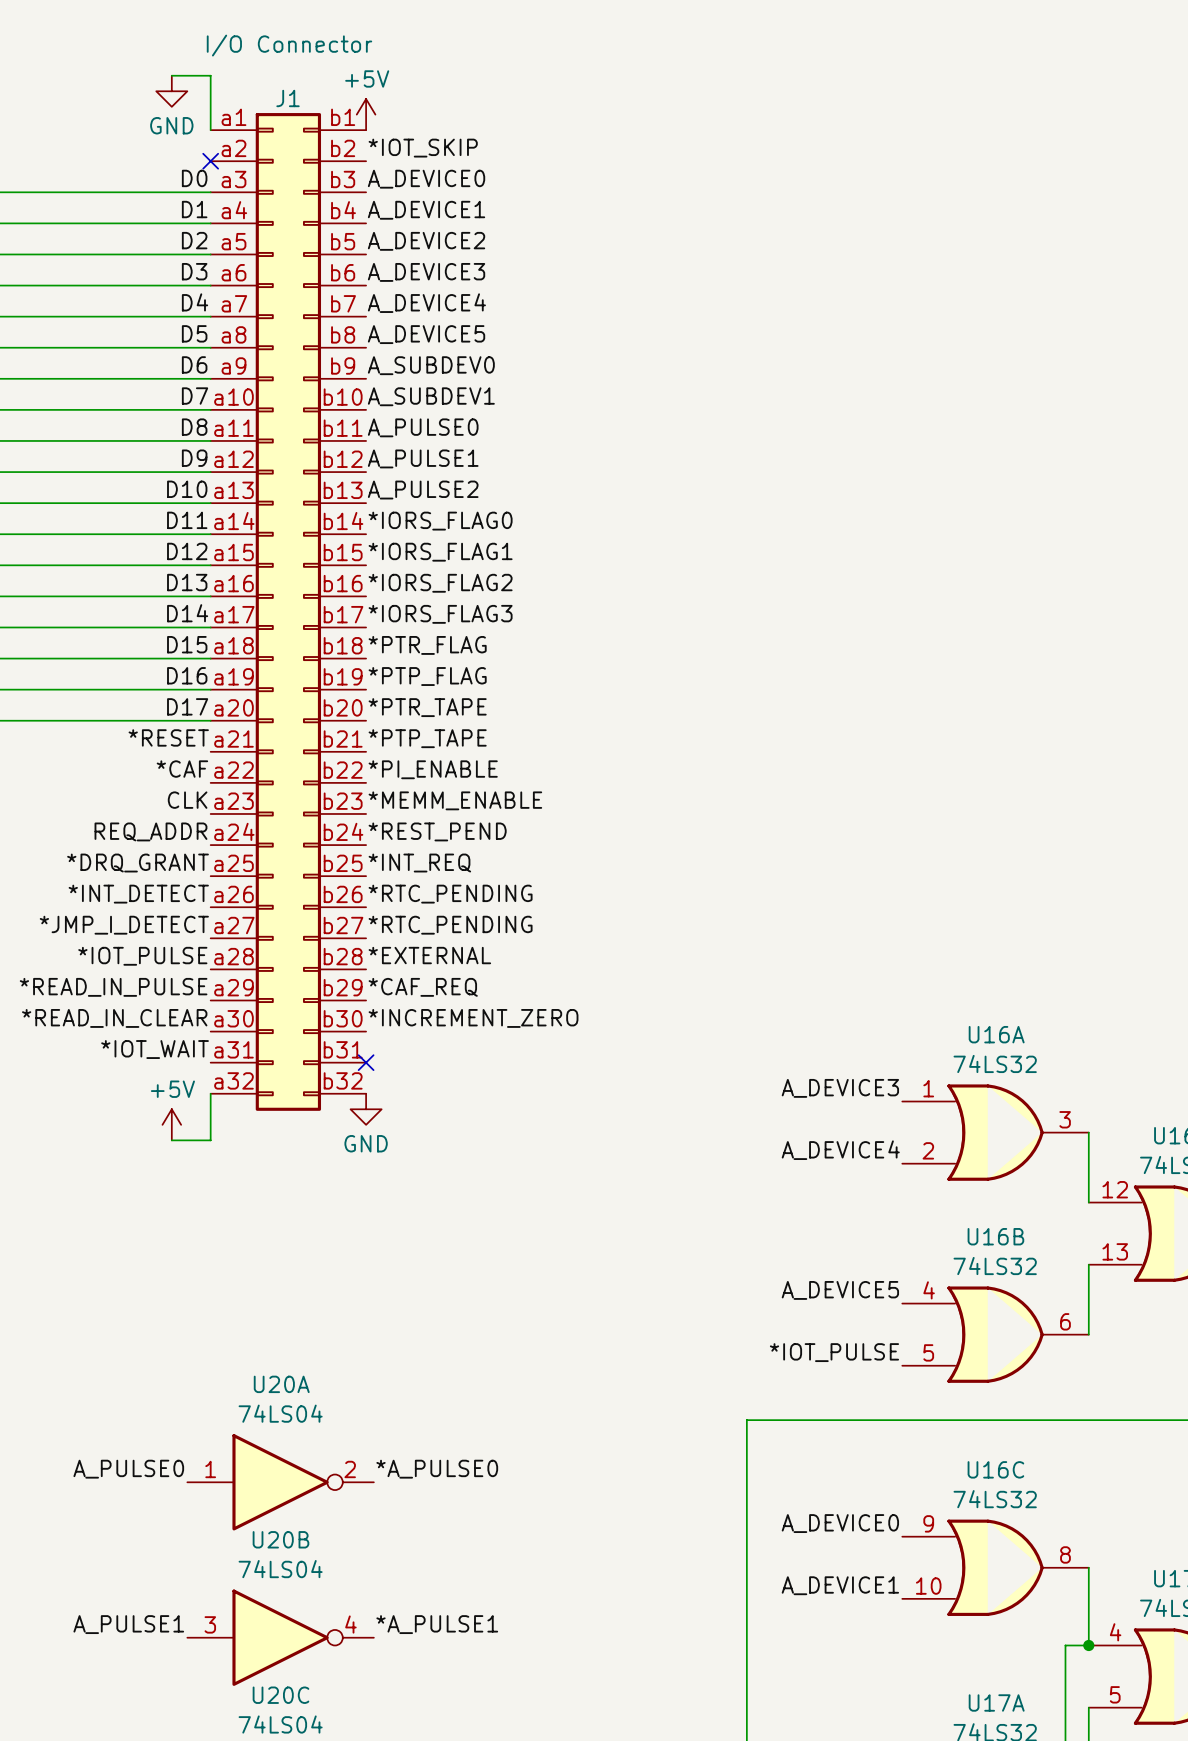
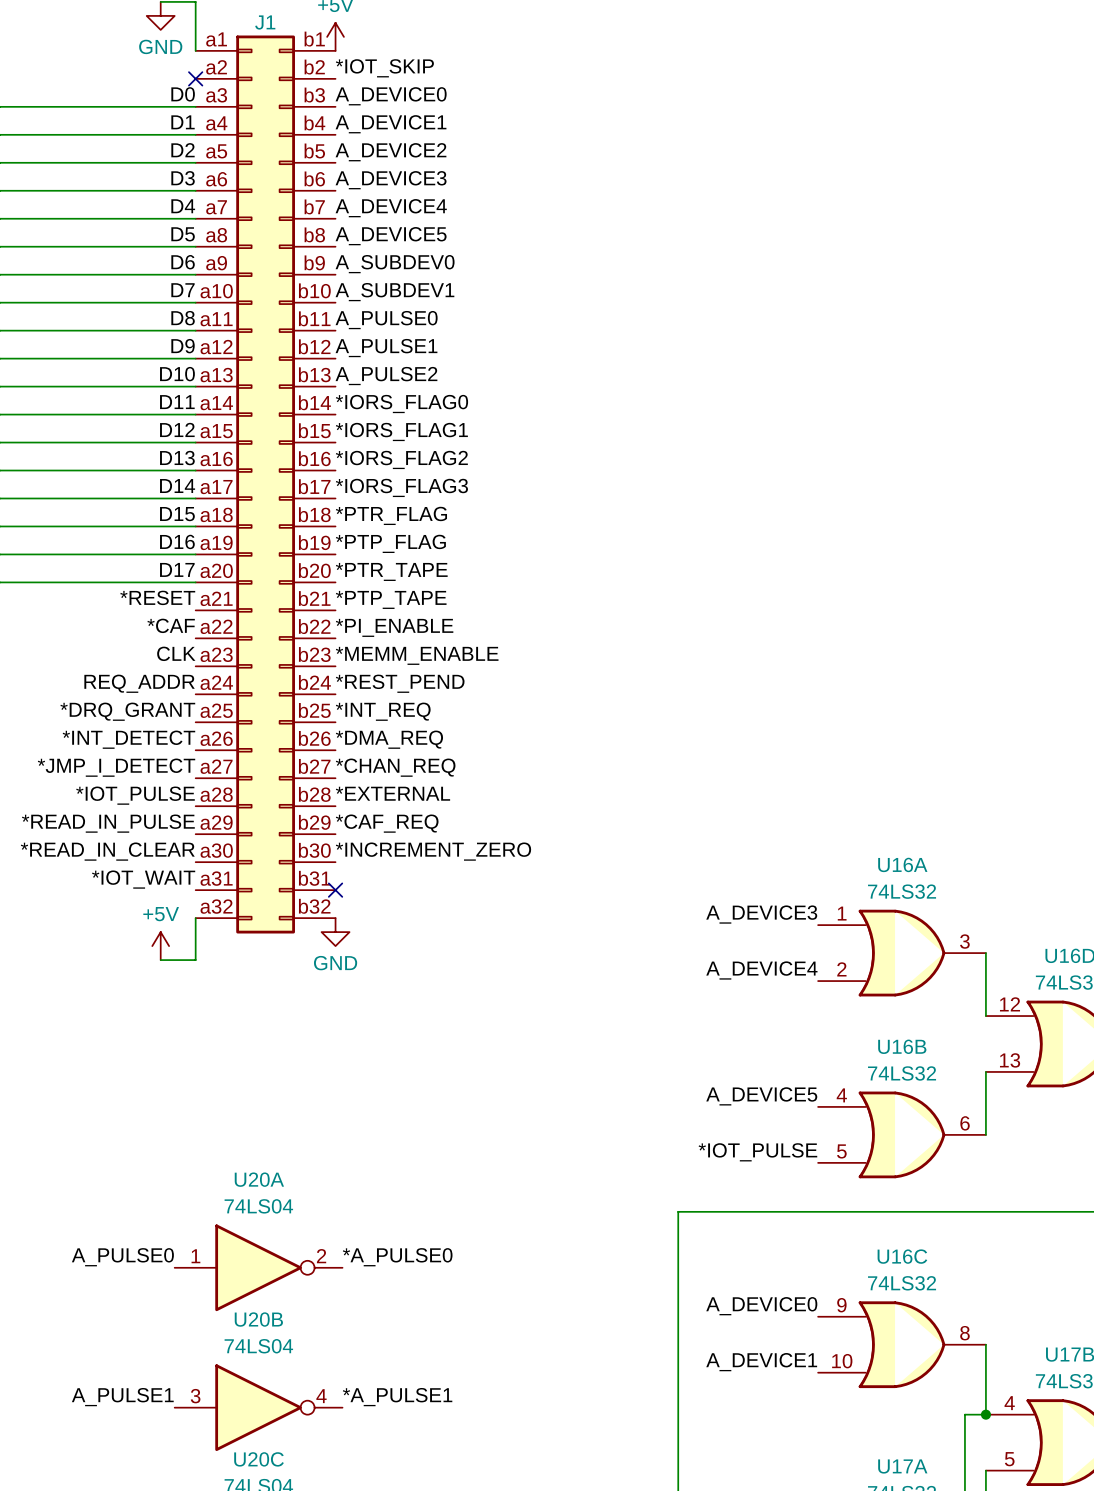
label: *RTC_PENDING (450, 894) -> *DMA_REQ (389, 739)
label: *RTC_PENDING (450, 925) -> *CHAN_REQ (395, 767)

